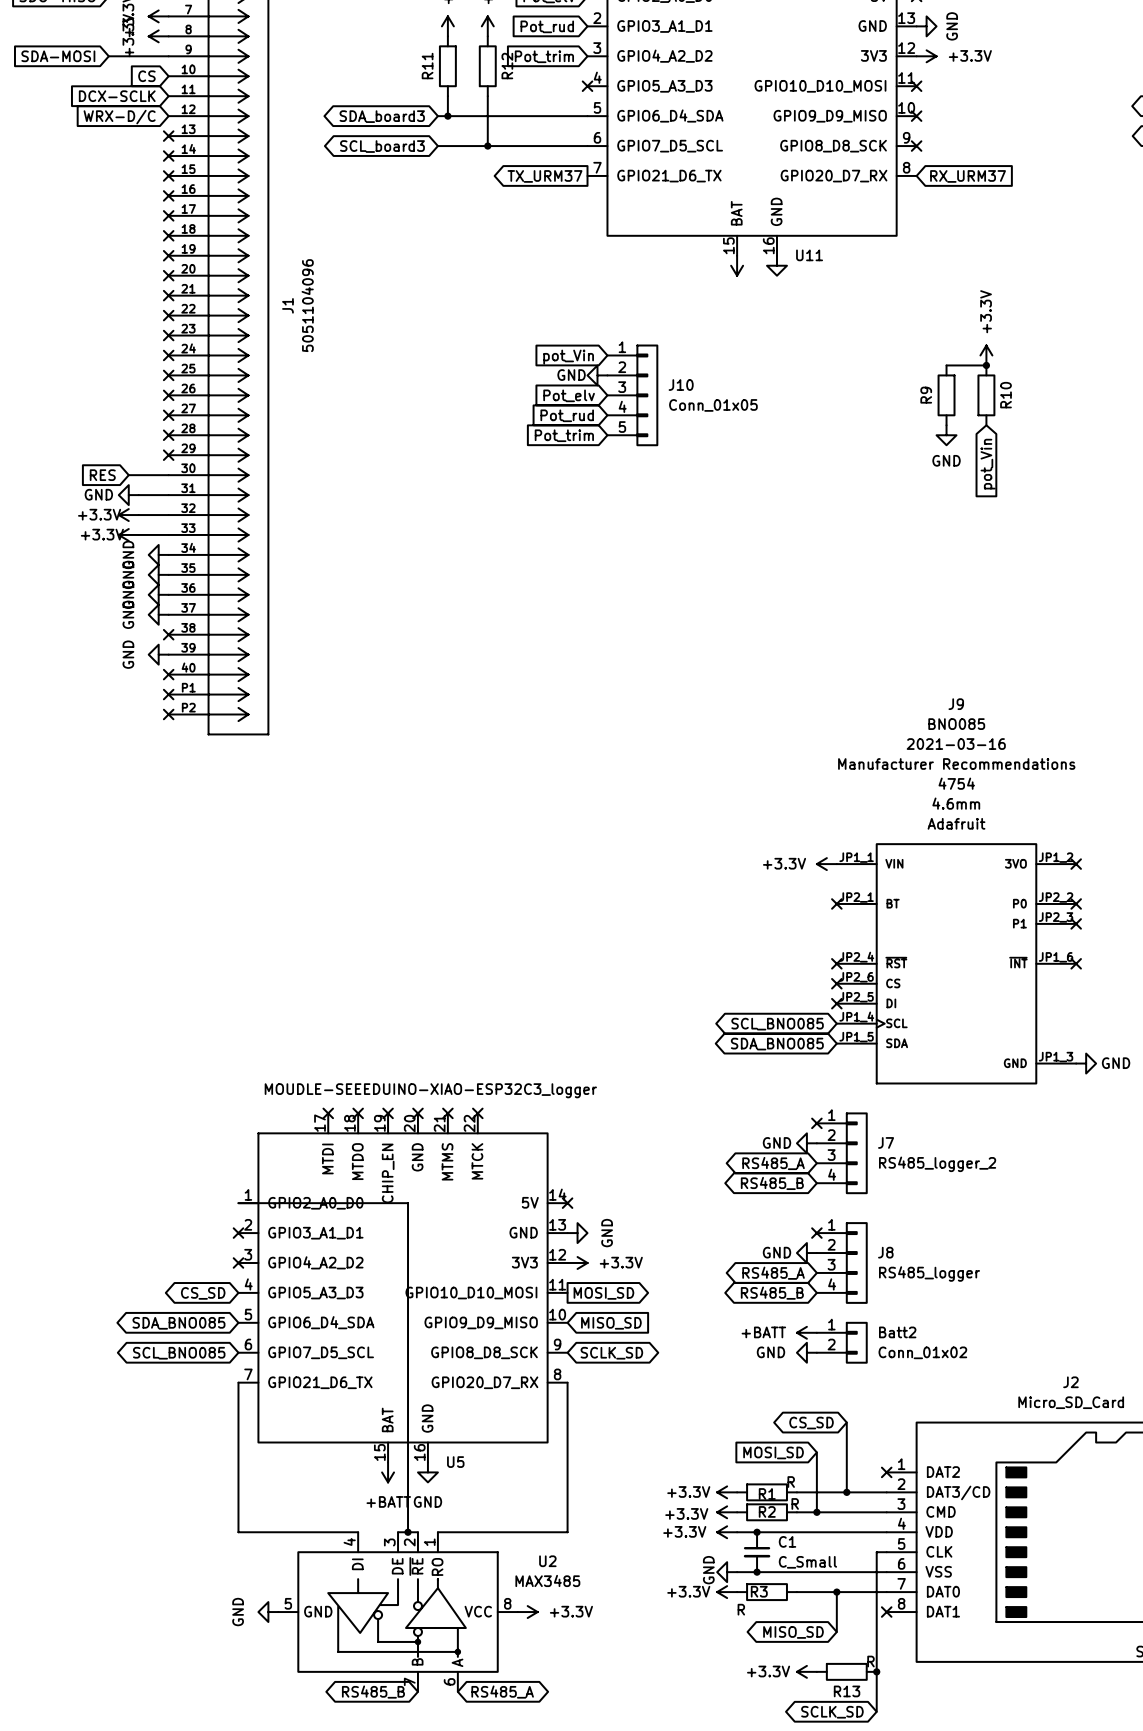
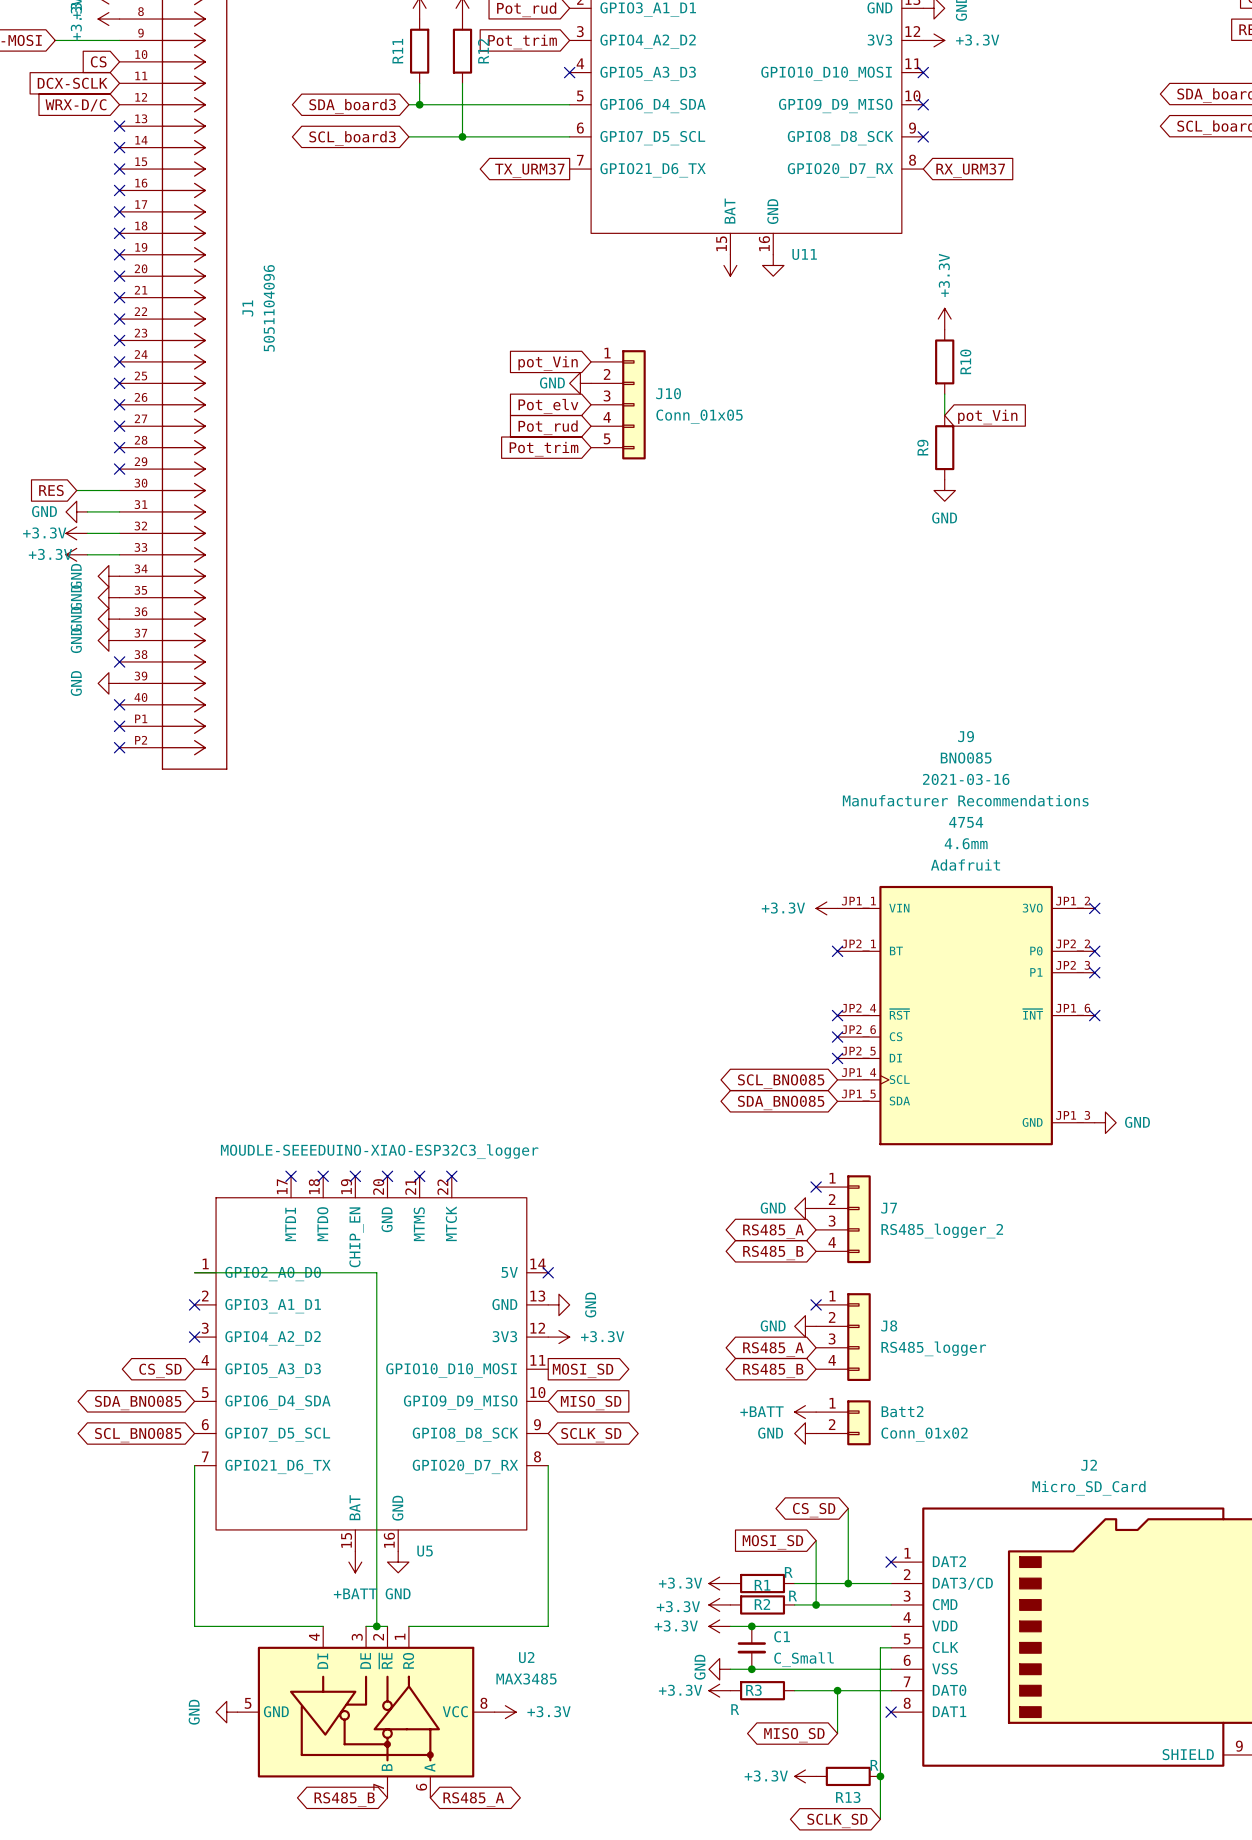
power symbol position: +3.3V (986, 355) -> +3.3V (944, 319)
wire: (946, 365) (986, 365) -> none
junction: (986, 365) -> none
wire: none -> (944, 394) (944, 415)
R9 position: (946, 395) -> (944, 447)
R10 position: (986, 395) -> (944, 361)
power symbol position: GND (946, 435) -> GND (944, 490)
global label rotation: 0° (988, 464) -> 90° counterclockwise (987, 417)

